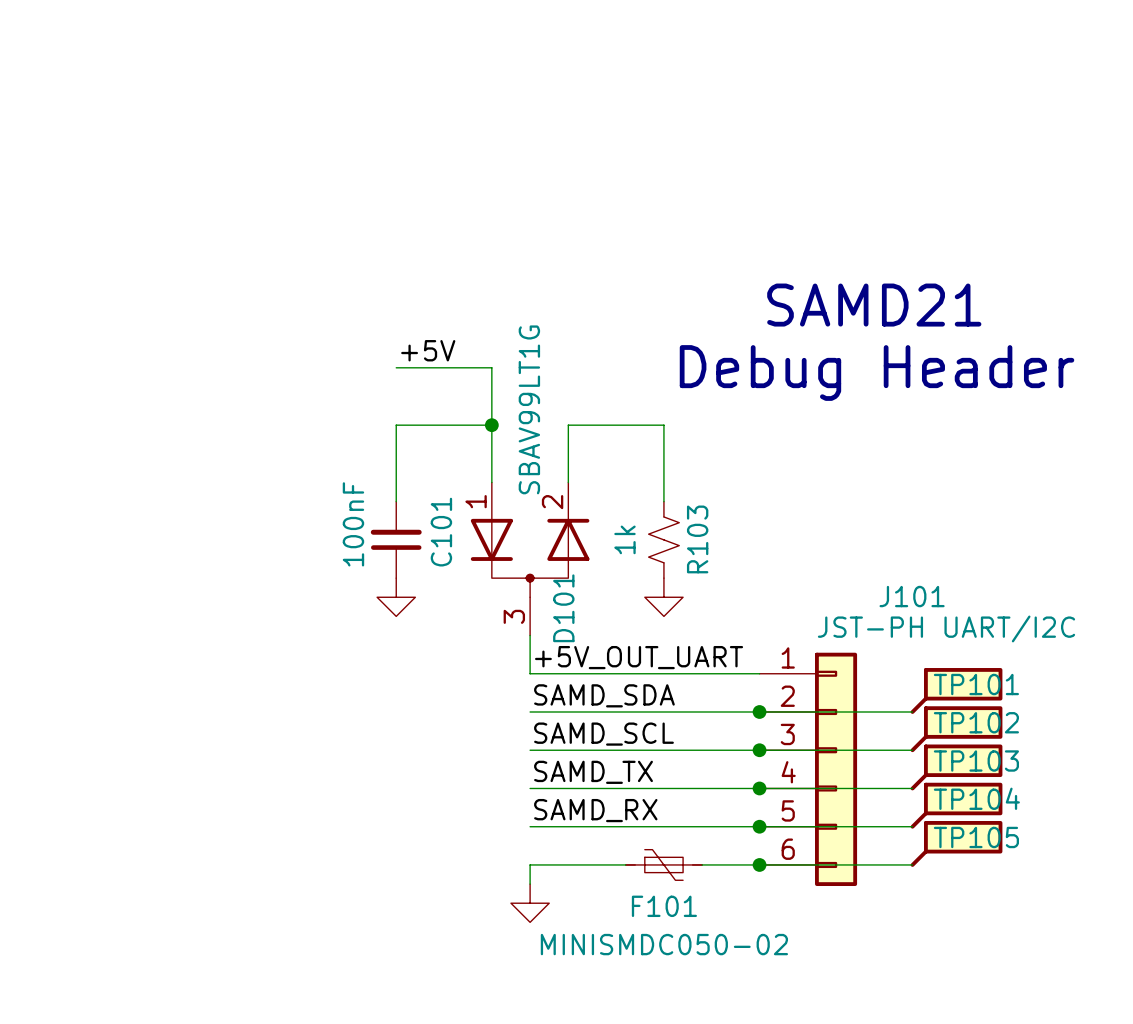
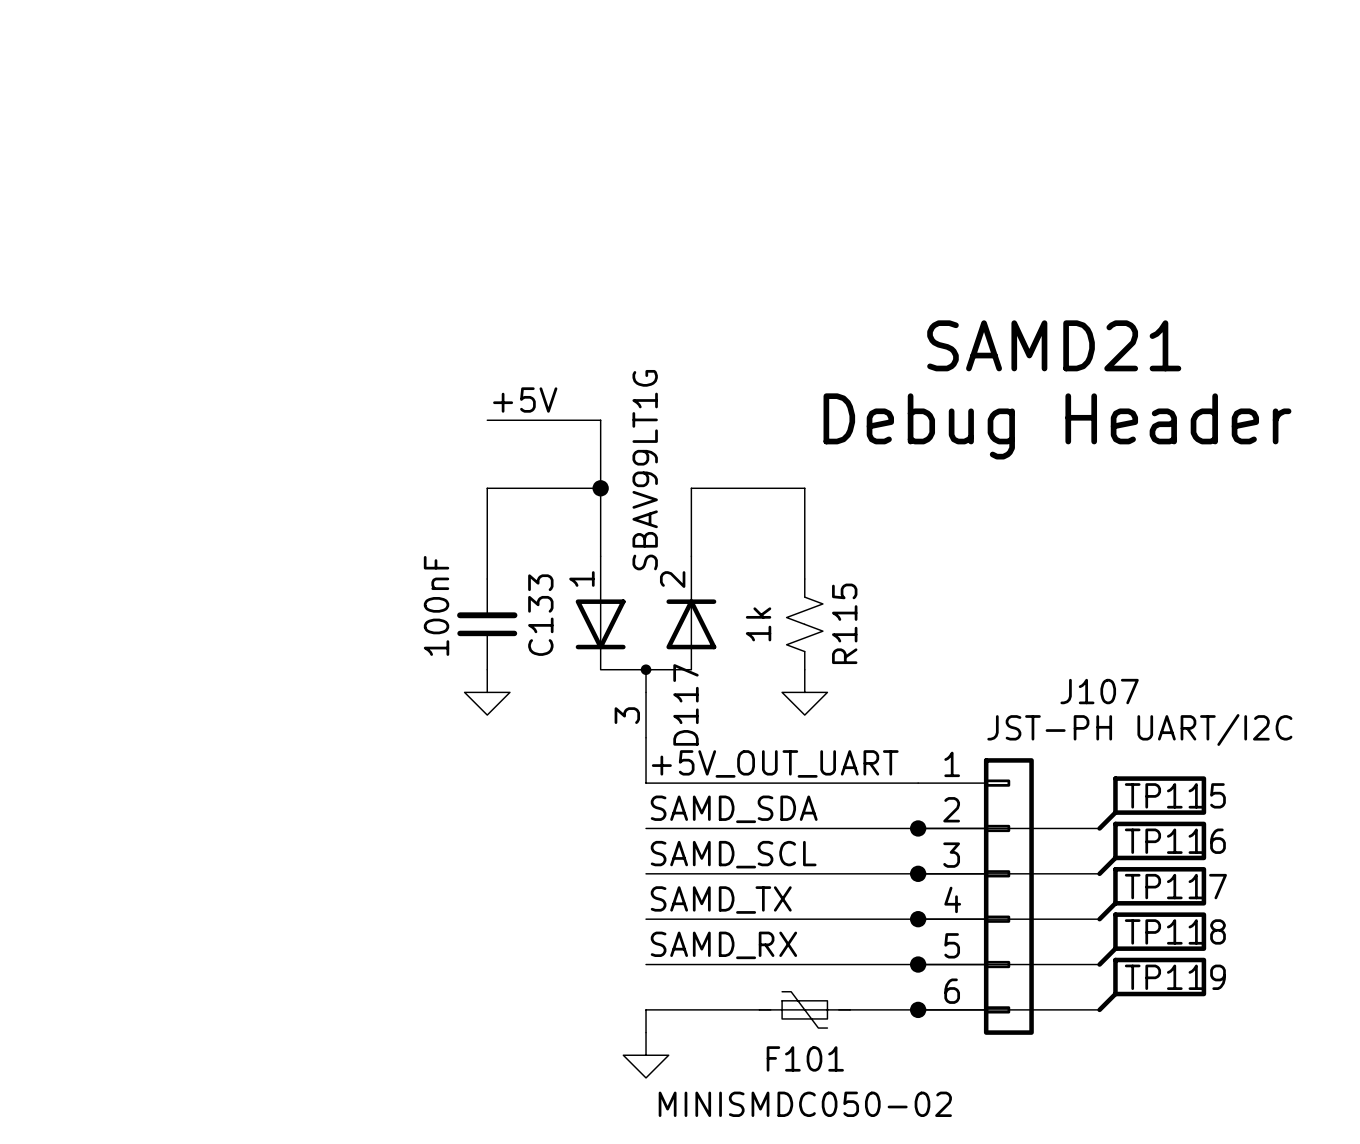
C101 name: C101 (441, 532) -> C133 (540, 615)
R103 name: R103 (697, 539) -> R115 (844, 623)
J101 name: J101 (912, 596) -> J107 (1099, 691)
D101 name: D101 (563, 608) -> D117 (685, 704)
TP101 name: TP101 (976, 684) -> TP115 (1175, 795)
TP102 name: TP102 (976, 722) -> TP116 (1175, 841)
TP103 name: TP103 (976, 760) -> TP117 (1175, 886)
TP104 name: TP104 (976, 798) -> TP118 (1175, 931)
TP105 name: TP105 (976, 837) -> TP119 (1175, 977)

